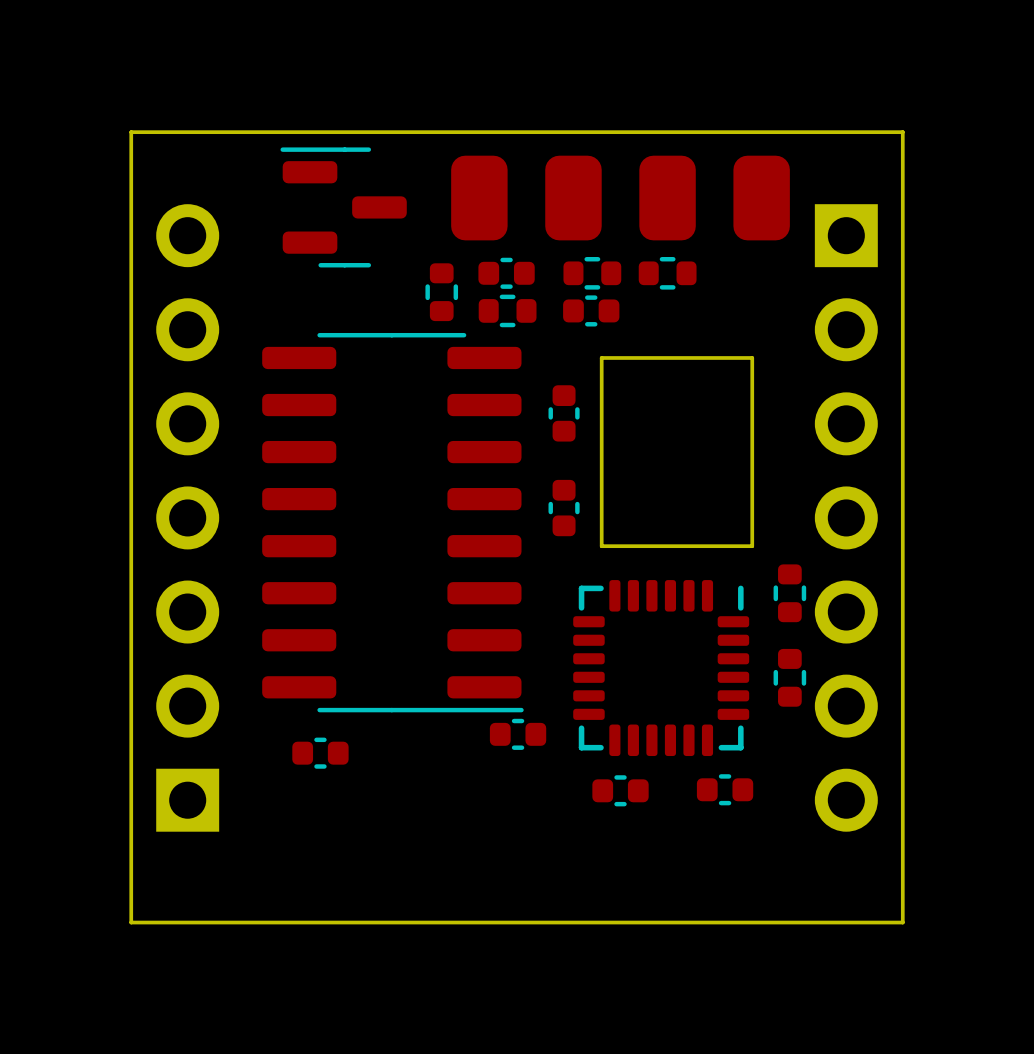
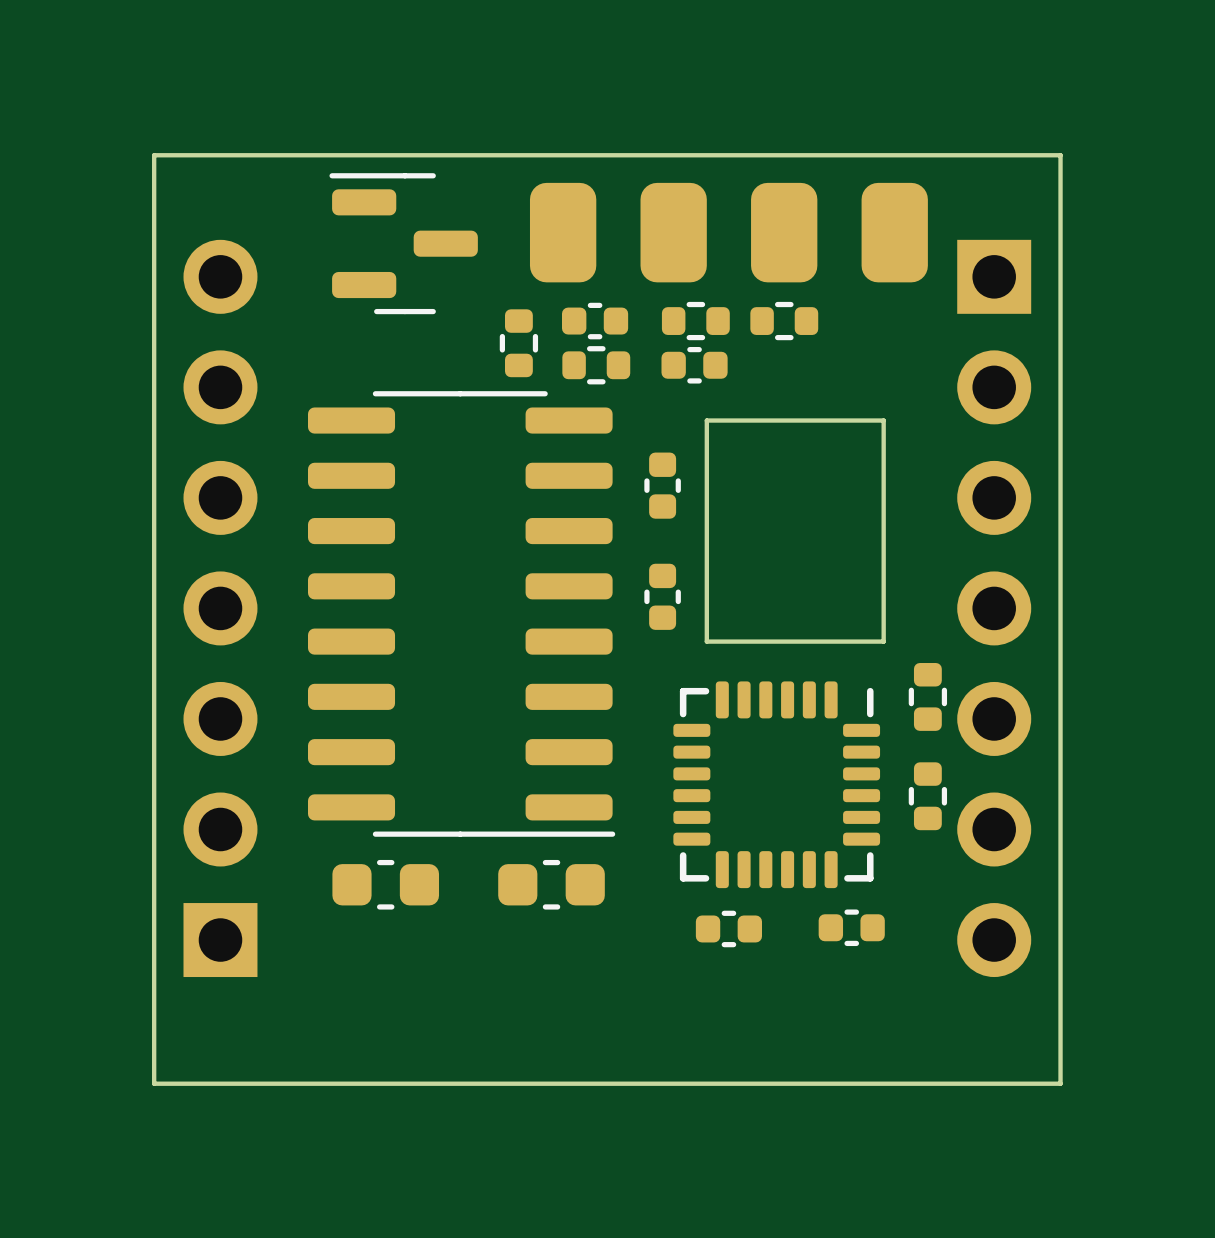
part: (518, 734) -> none
part footprint: [292, 737, 349, 769] -> [332, 859, 440, 910]
part: none -> (551, 884)

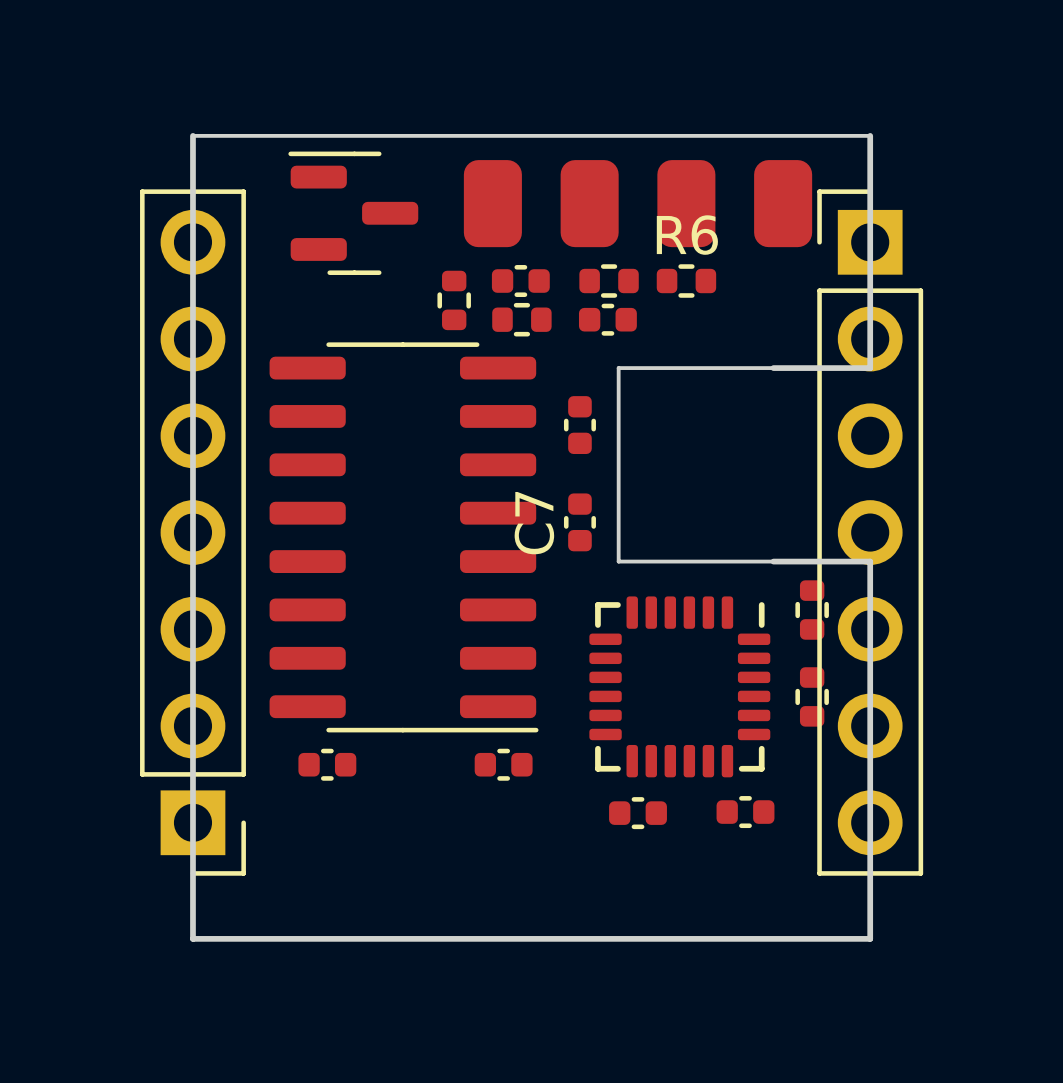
board edge: (220, 155) (154, 155) (154, 1083) (1060, 1083) (1060, 155) (994, 155) -> (192, 135) (192, 938) (870, 938) (870, 561) (773, 561)
part footprint: [183, 239, 258, 978] -> [140, 189, 246, 876]
part footprint: [957, 239, 1032, 978] -> [817, 189, 924, 876]
R6 name: none -> R6 (687, 235)
board edge: (883, 420) (883, 641) -> (773, 368) (870, 368) (870, 135)
C7 name: none -> C7 (534, 523)
part footprint: [332, 859, 440, 910] -> [298, 748, 357, 781]
part footprint: [498, 859, 605, 910] -> [474, 748, 533, 781]

